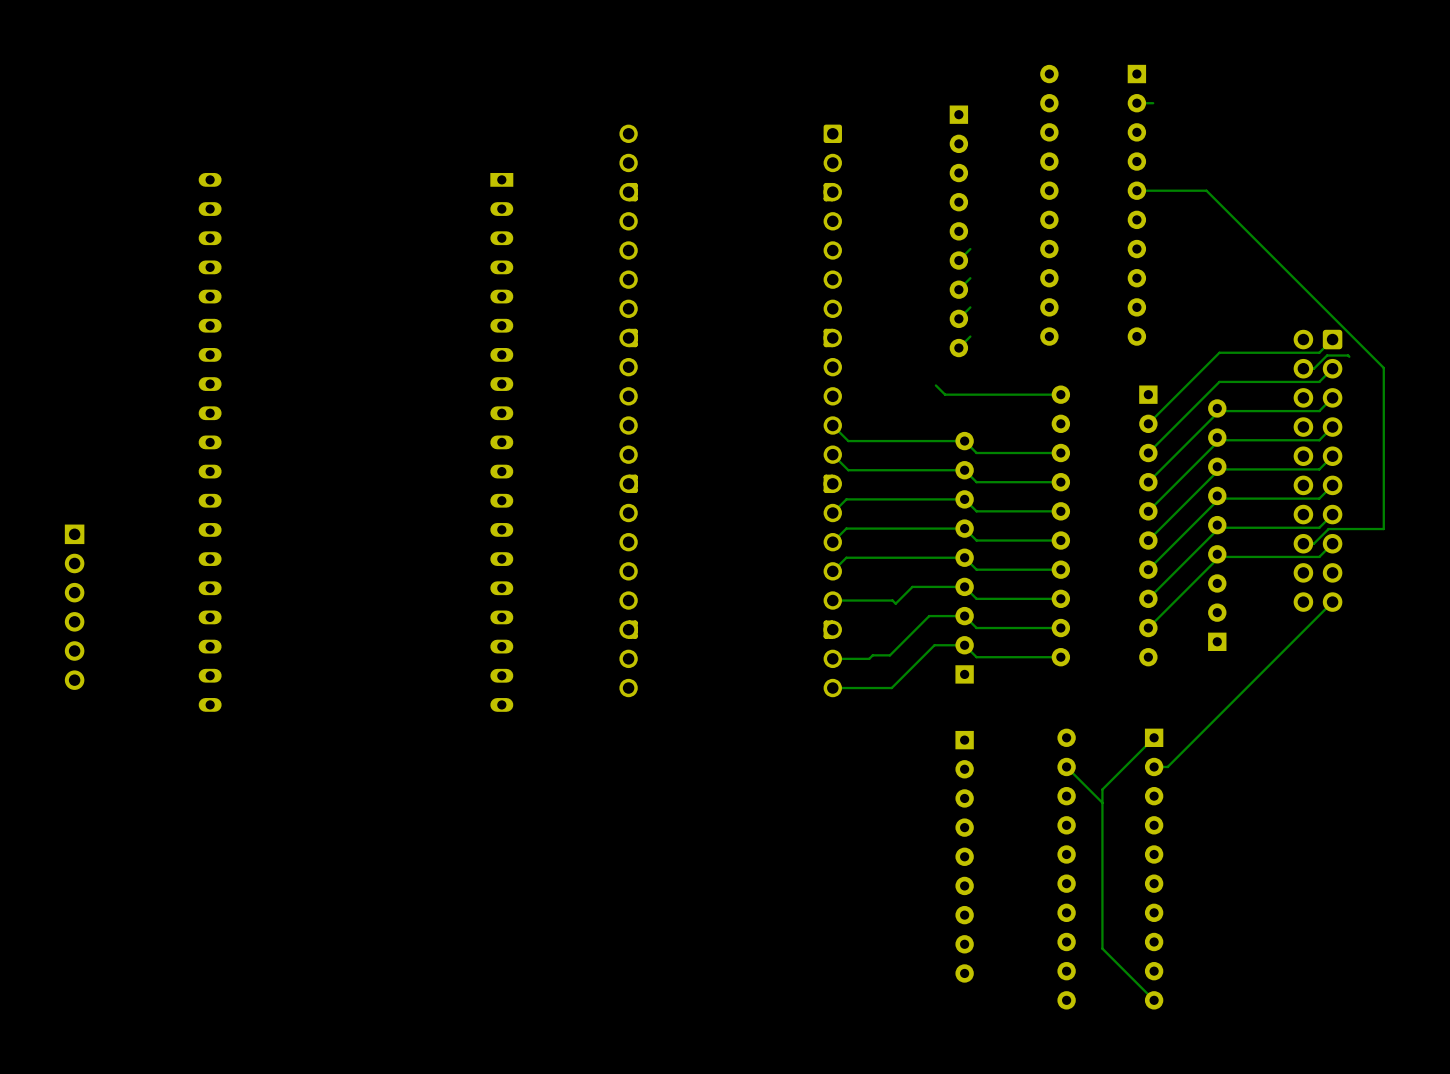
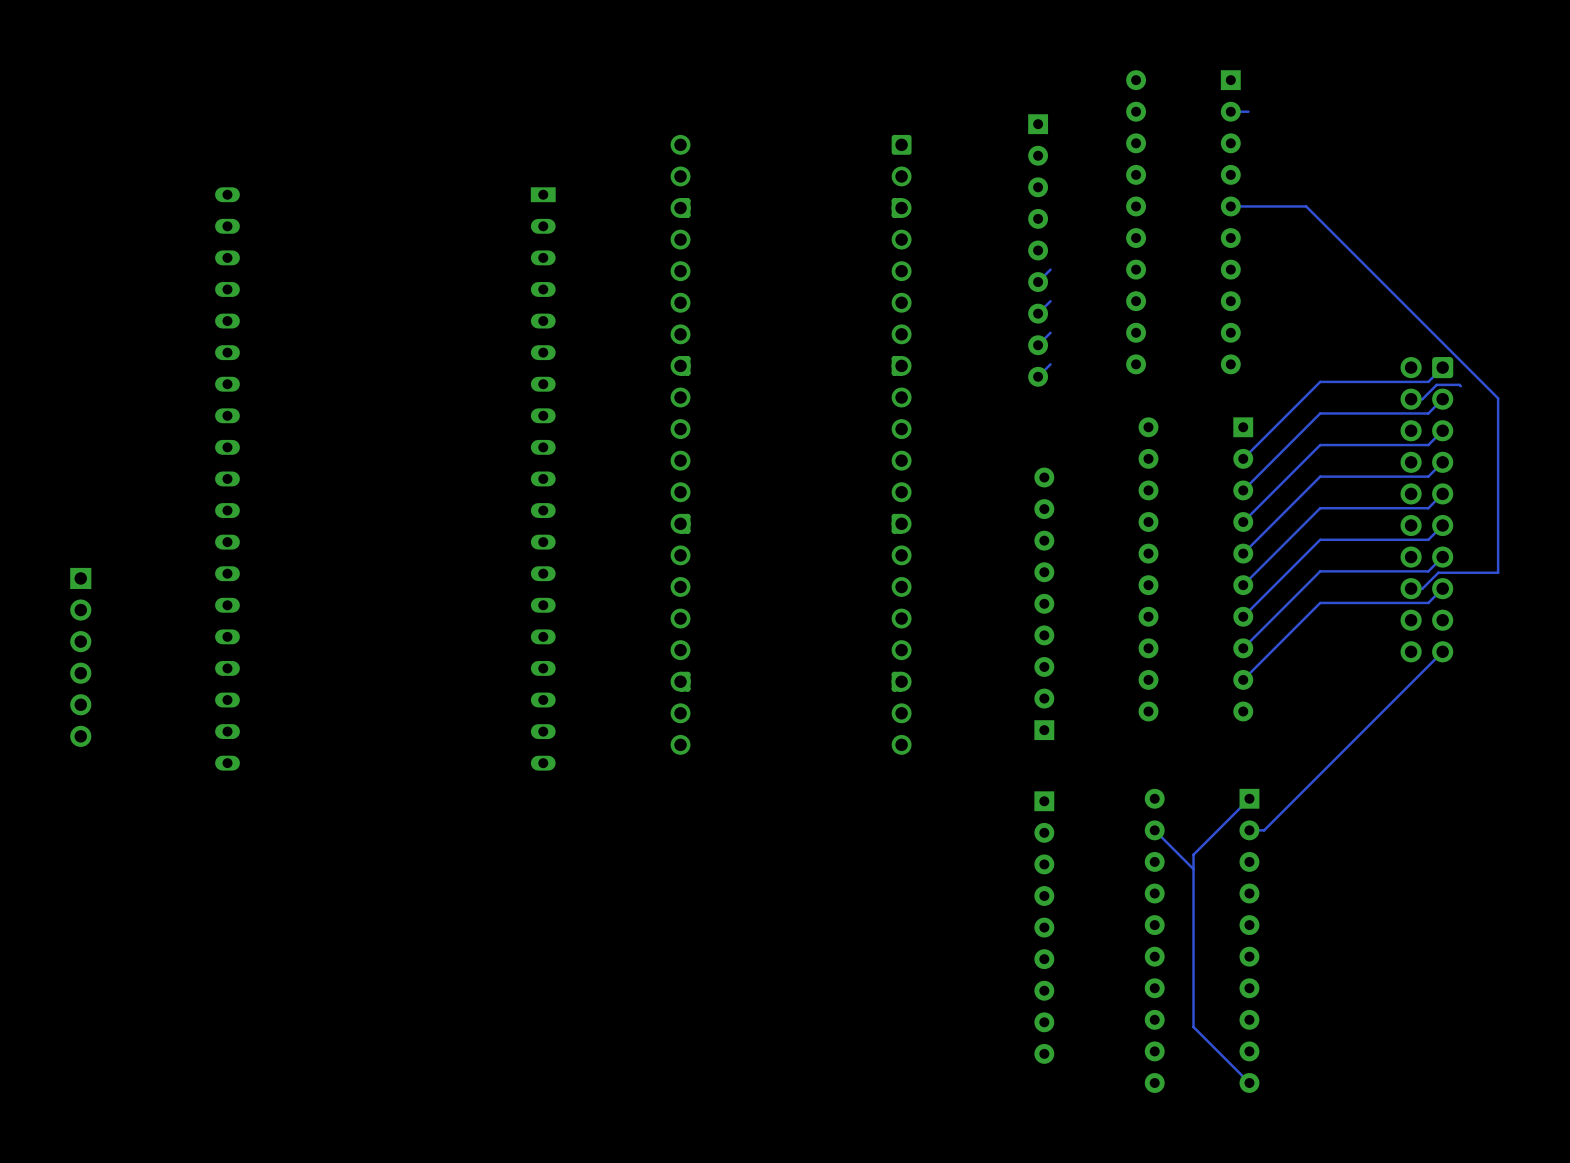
track: (935, 385) (945, 394) (1060, 394) -> none
track: (832, 425) (848, 441) (964, 441) (976, 453) (1060, 453) -> none
track: (832, 454) (848, 470) (964, 470) (976, 482) (1060, 482) -> none
track: (1060, 511) (976, 511) (964, 499) (846, 499) (832, 513) -> none
part: (1217, 525) -> none
track: (1060, 540) (976, 540) (964, 528) (846, 528) (832, 542) -> none
track: (1060, 569) (976, 569) (964, 557) (846, 557) (832, 571) -> none
track: (1060, 598) (976, 598) (964, 586) (912, 586) (895, 603) (892, 600) (832, 600) -> none
track: (1060, 628) (976, 628) (964, 616) (929, 616) (889, 655) (872, 655) (869, 658) (832, 658) -> none
track: (1060, 657) (976, 657) (964, 645) (934, 645) (891, 688) (832, 688) -> none

